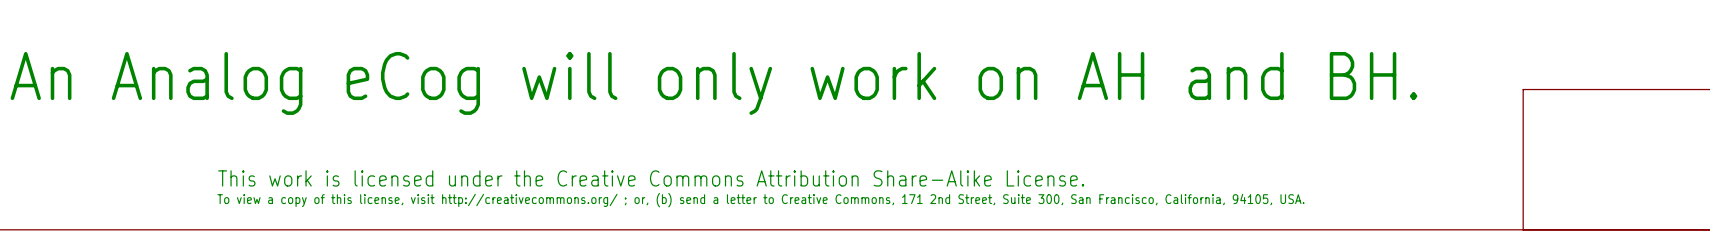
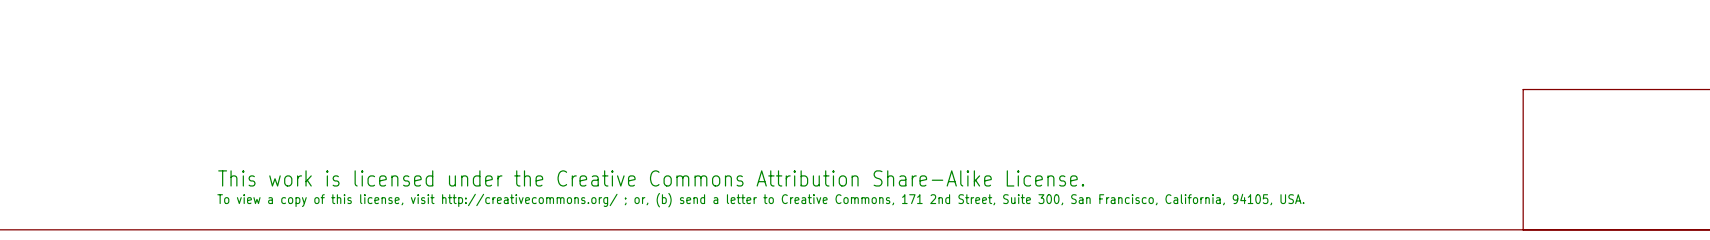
text: An Analog eCog will only work on AH and BH. (713, 83) -> none

